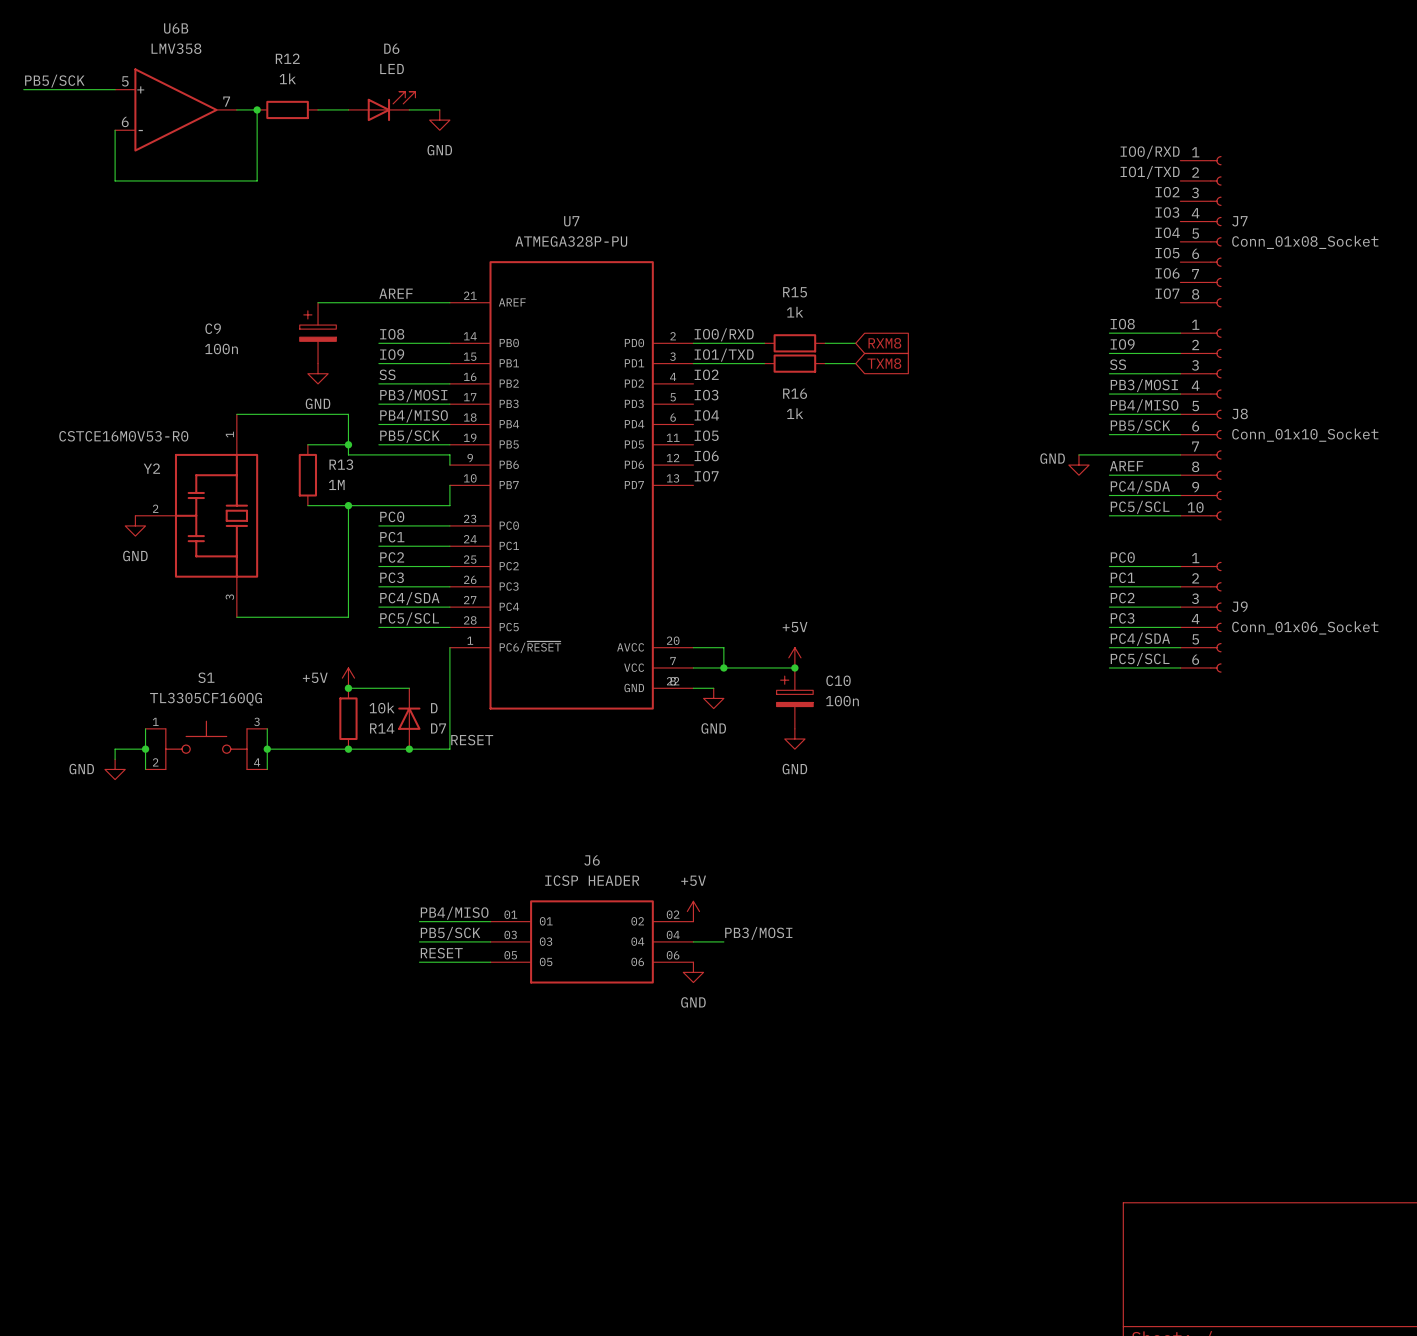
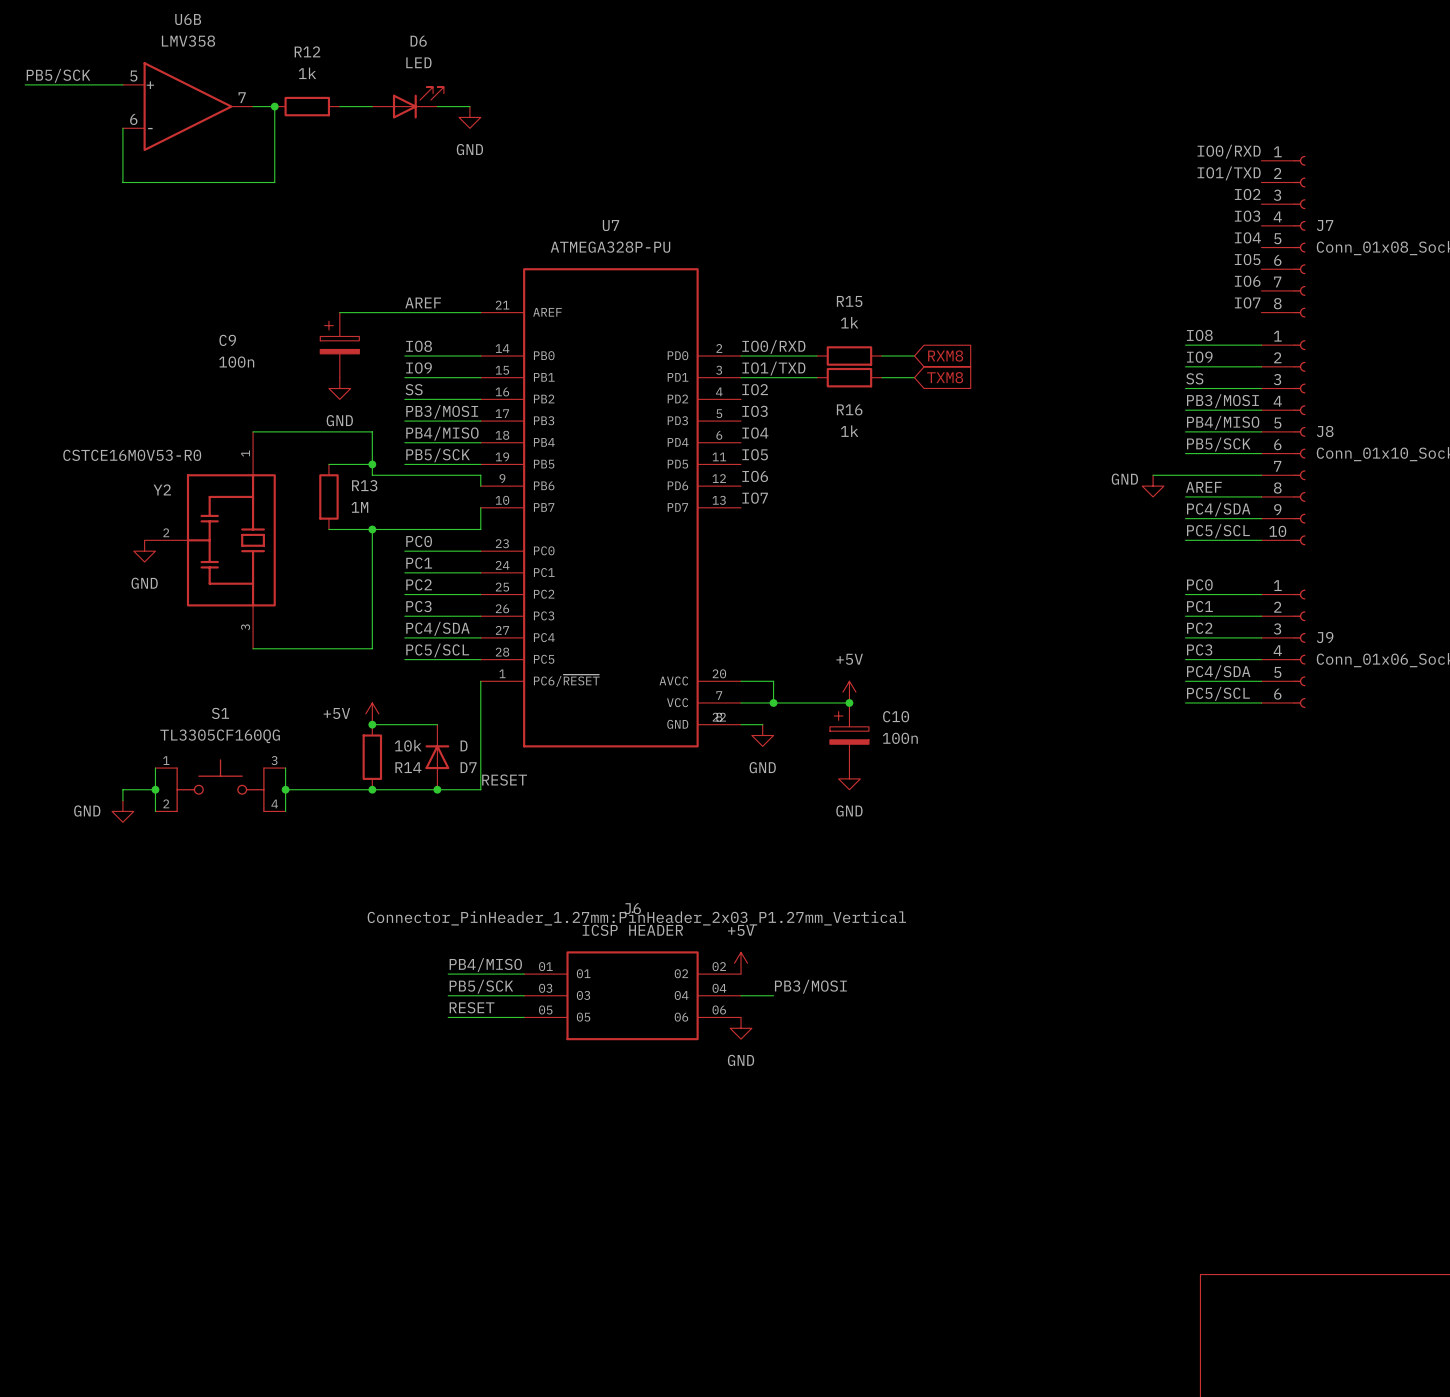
J6 text: none -> Connector_PinHeader_1.27mm:PinHeader_2x03_P1.27mm_Vertical (636, 918)

